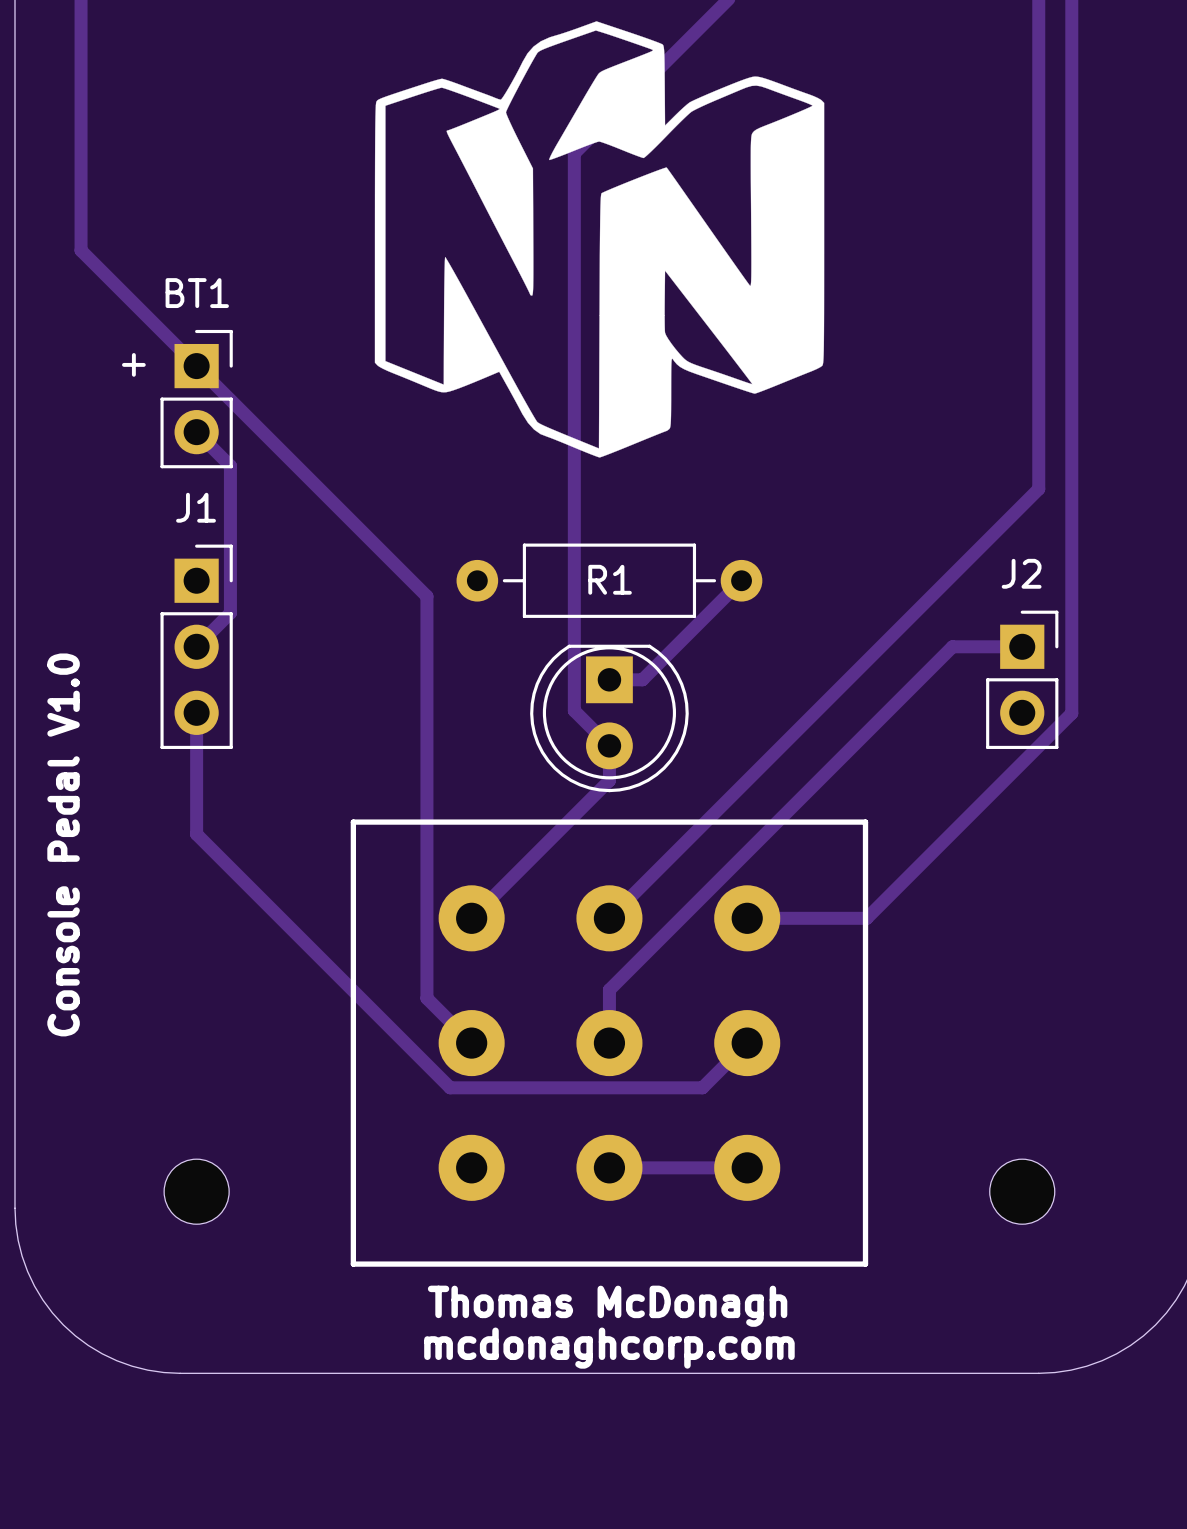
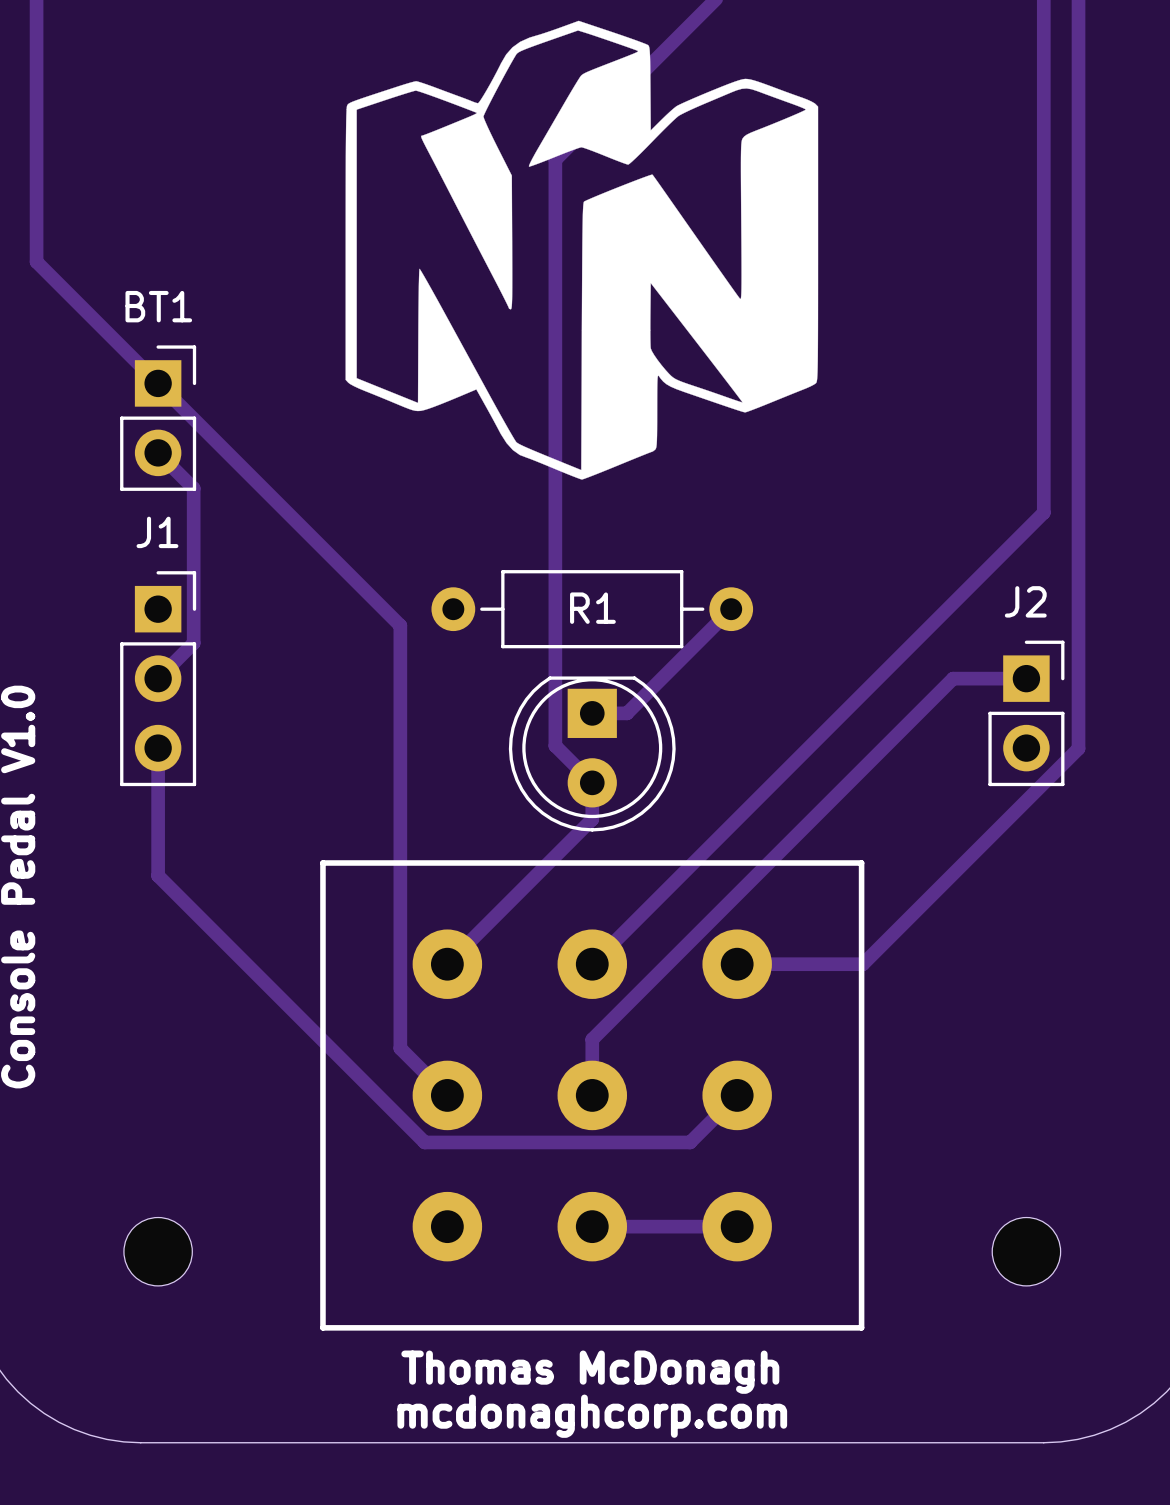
text: + (133, 364) -> none

